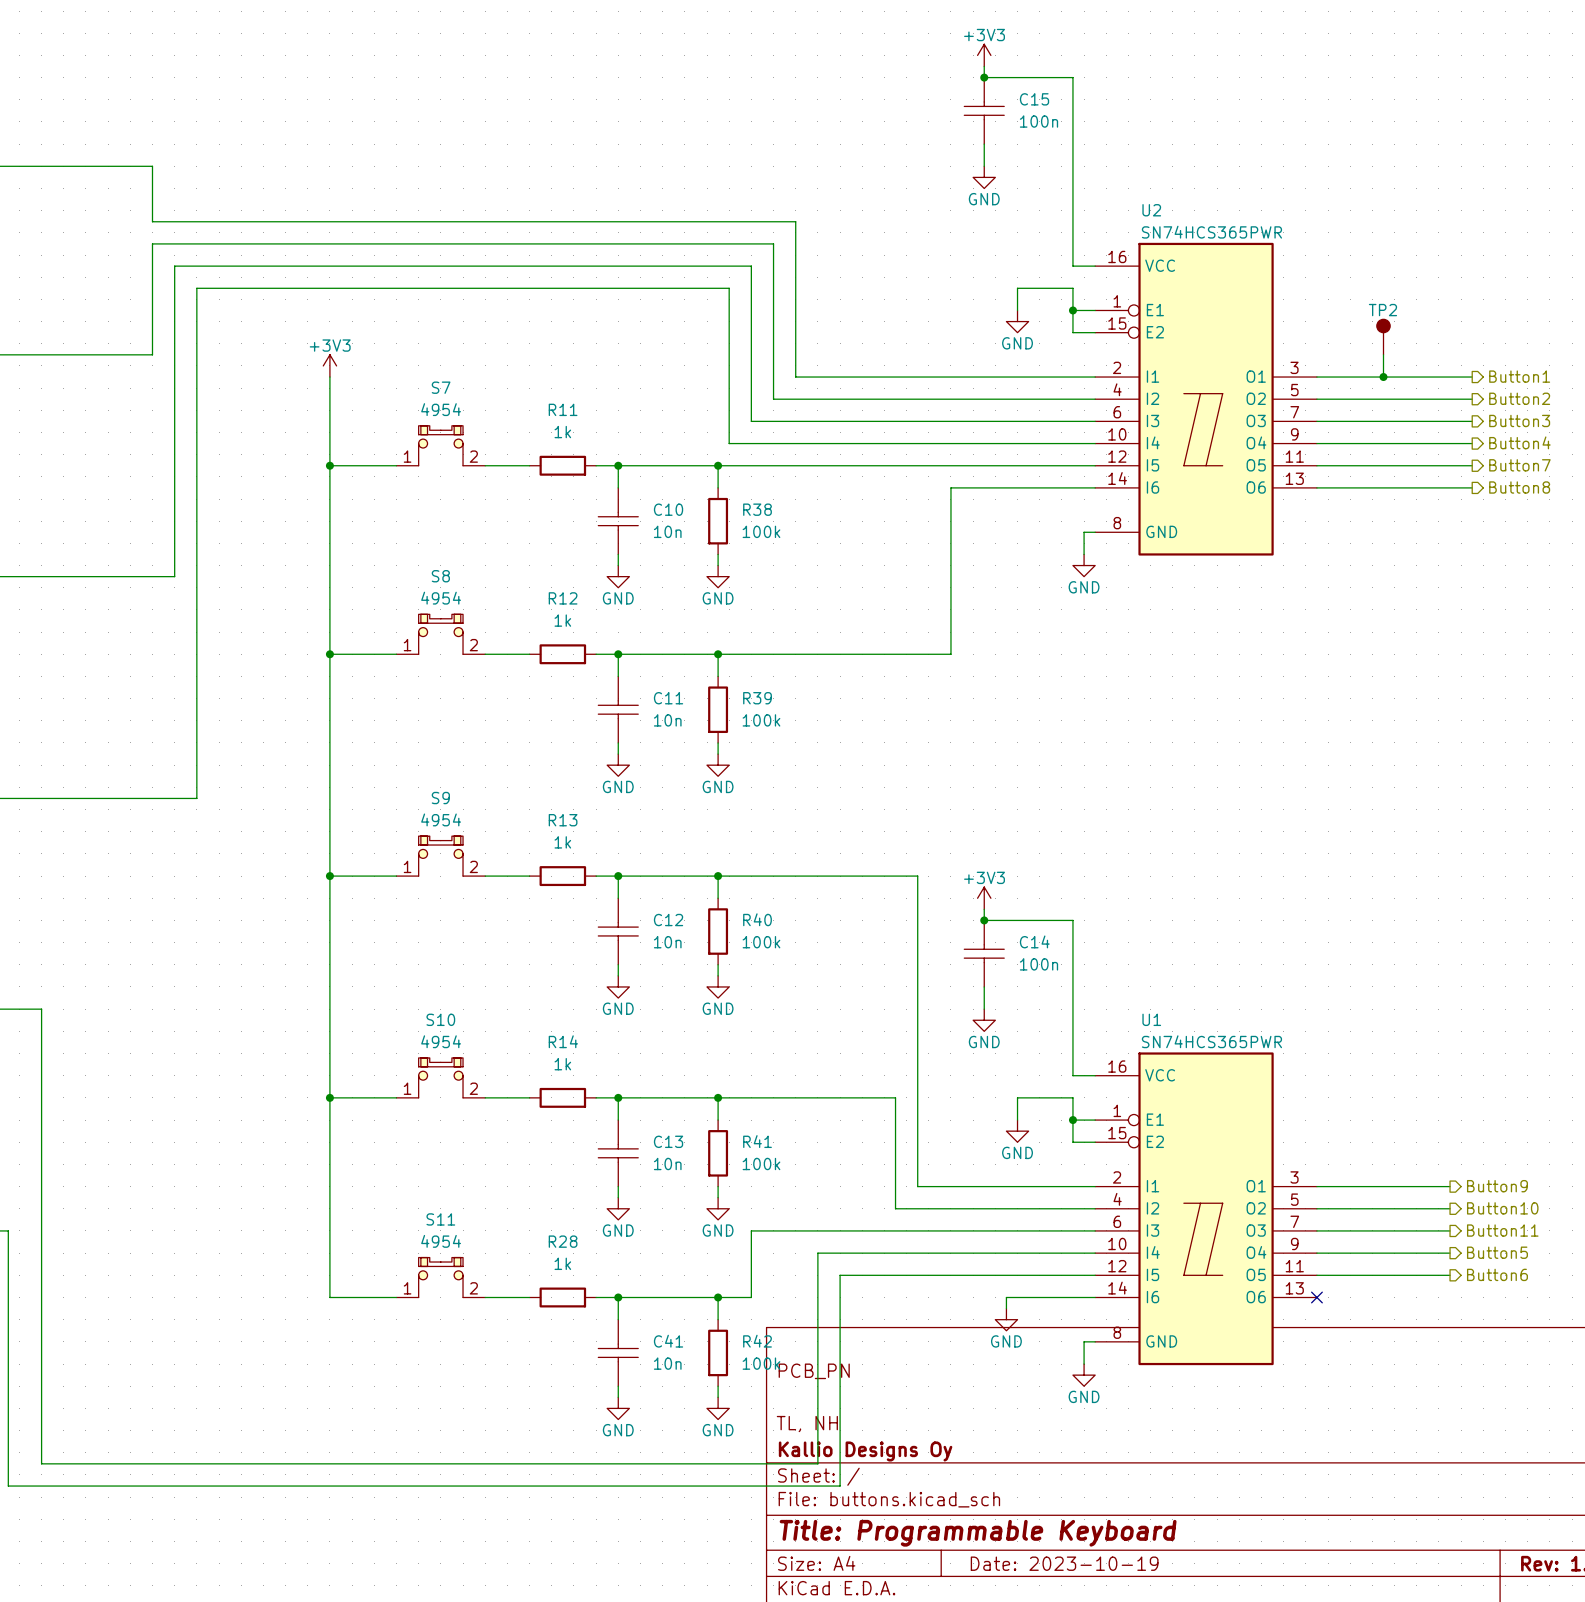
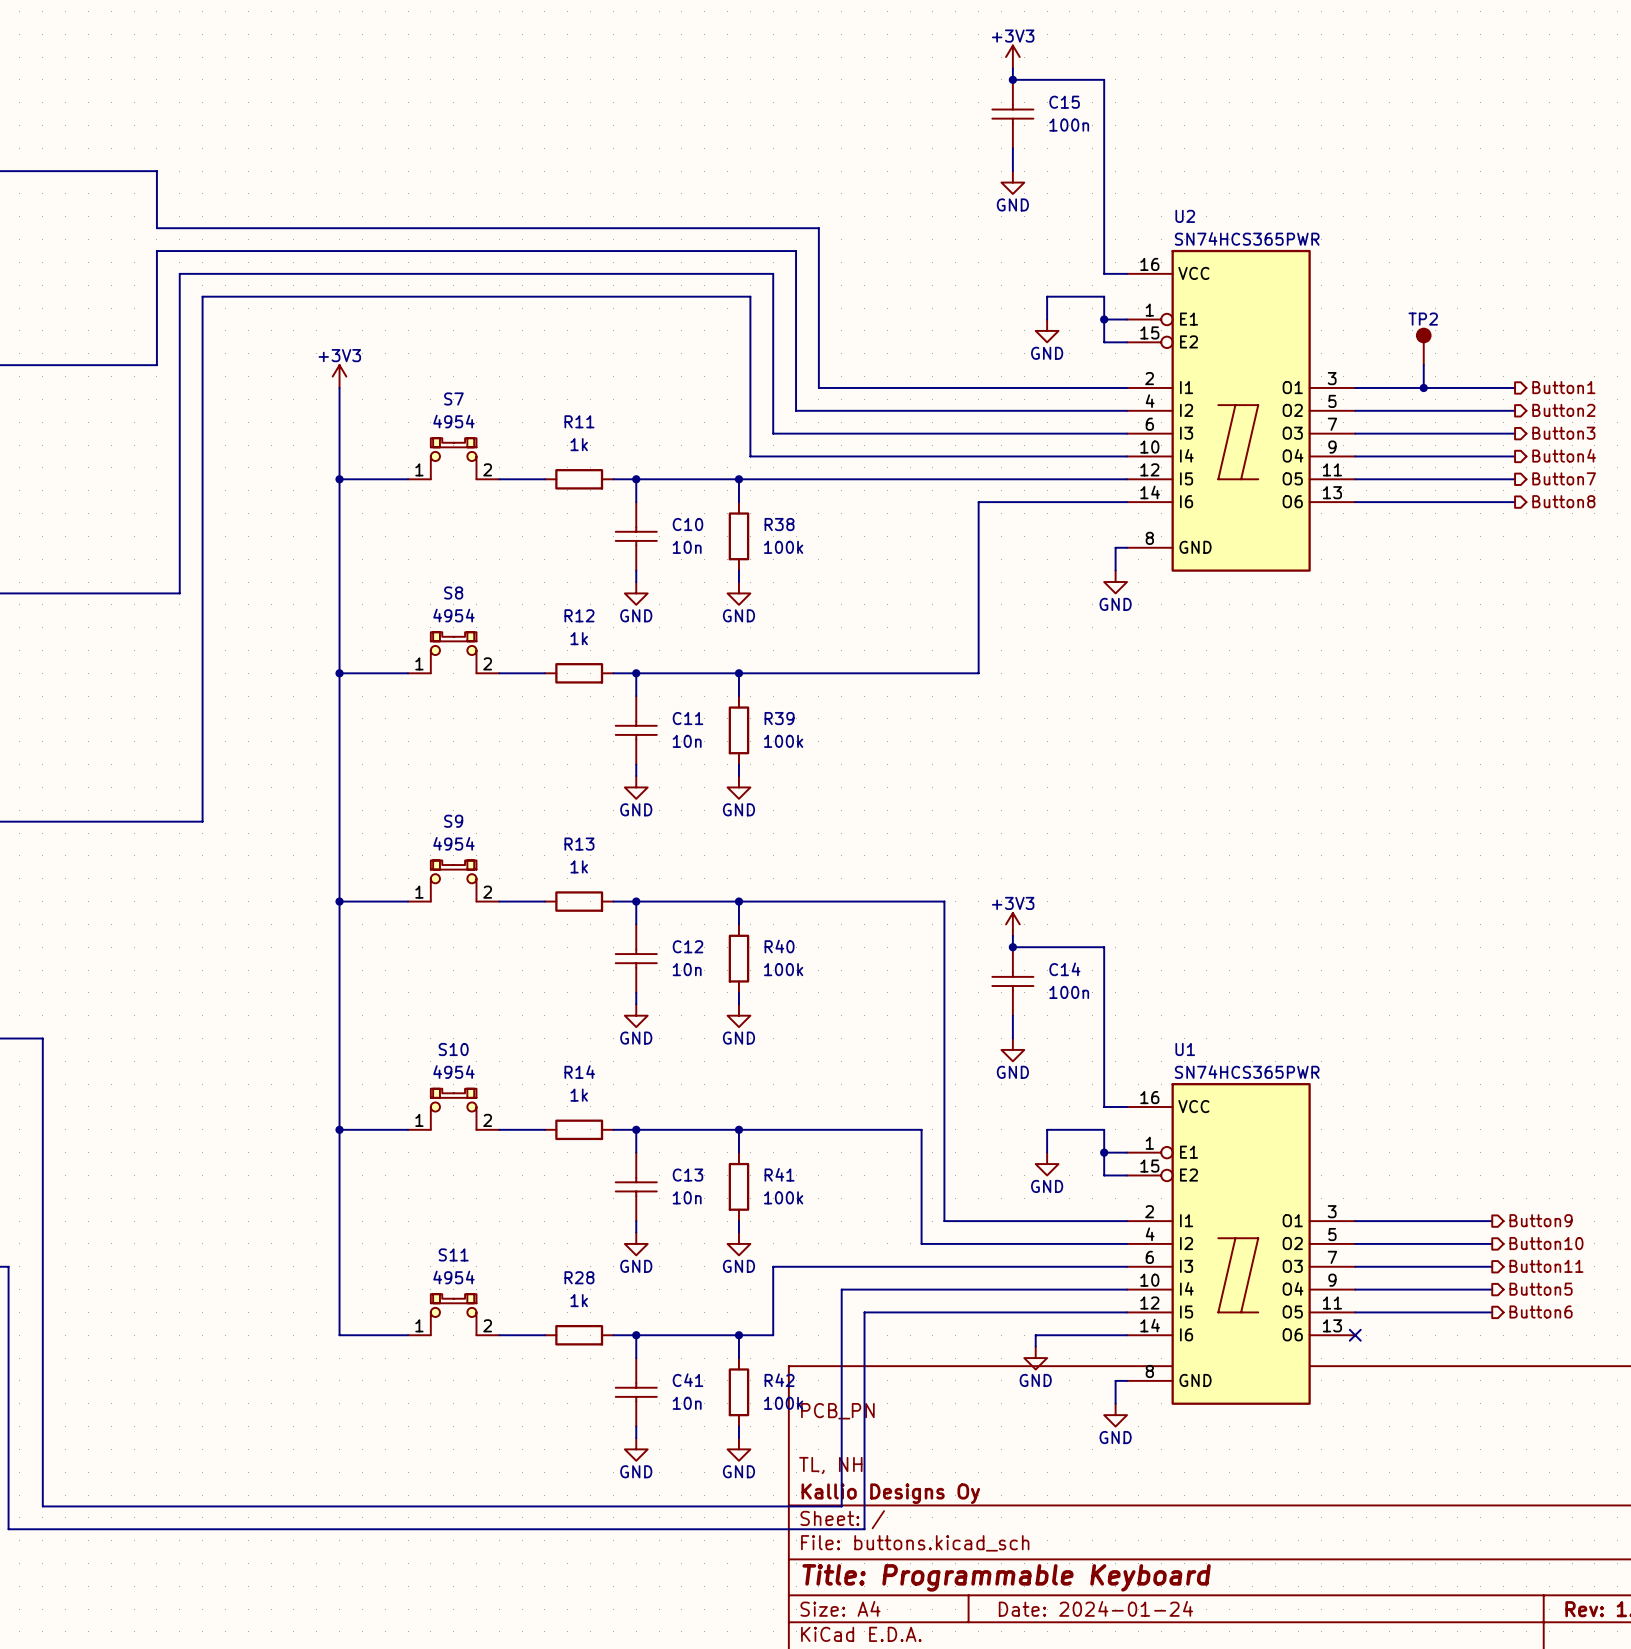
title block: Date: 2023-10-19 (1064, 1563) -> Date: 2024-01-24 (1095, 1608)

